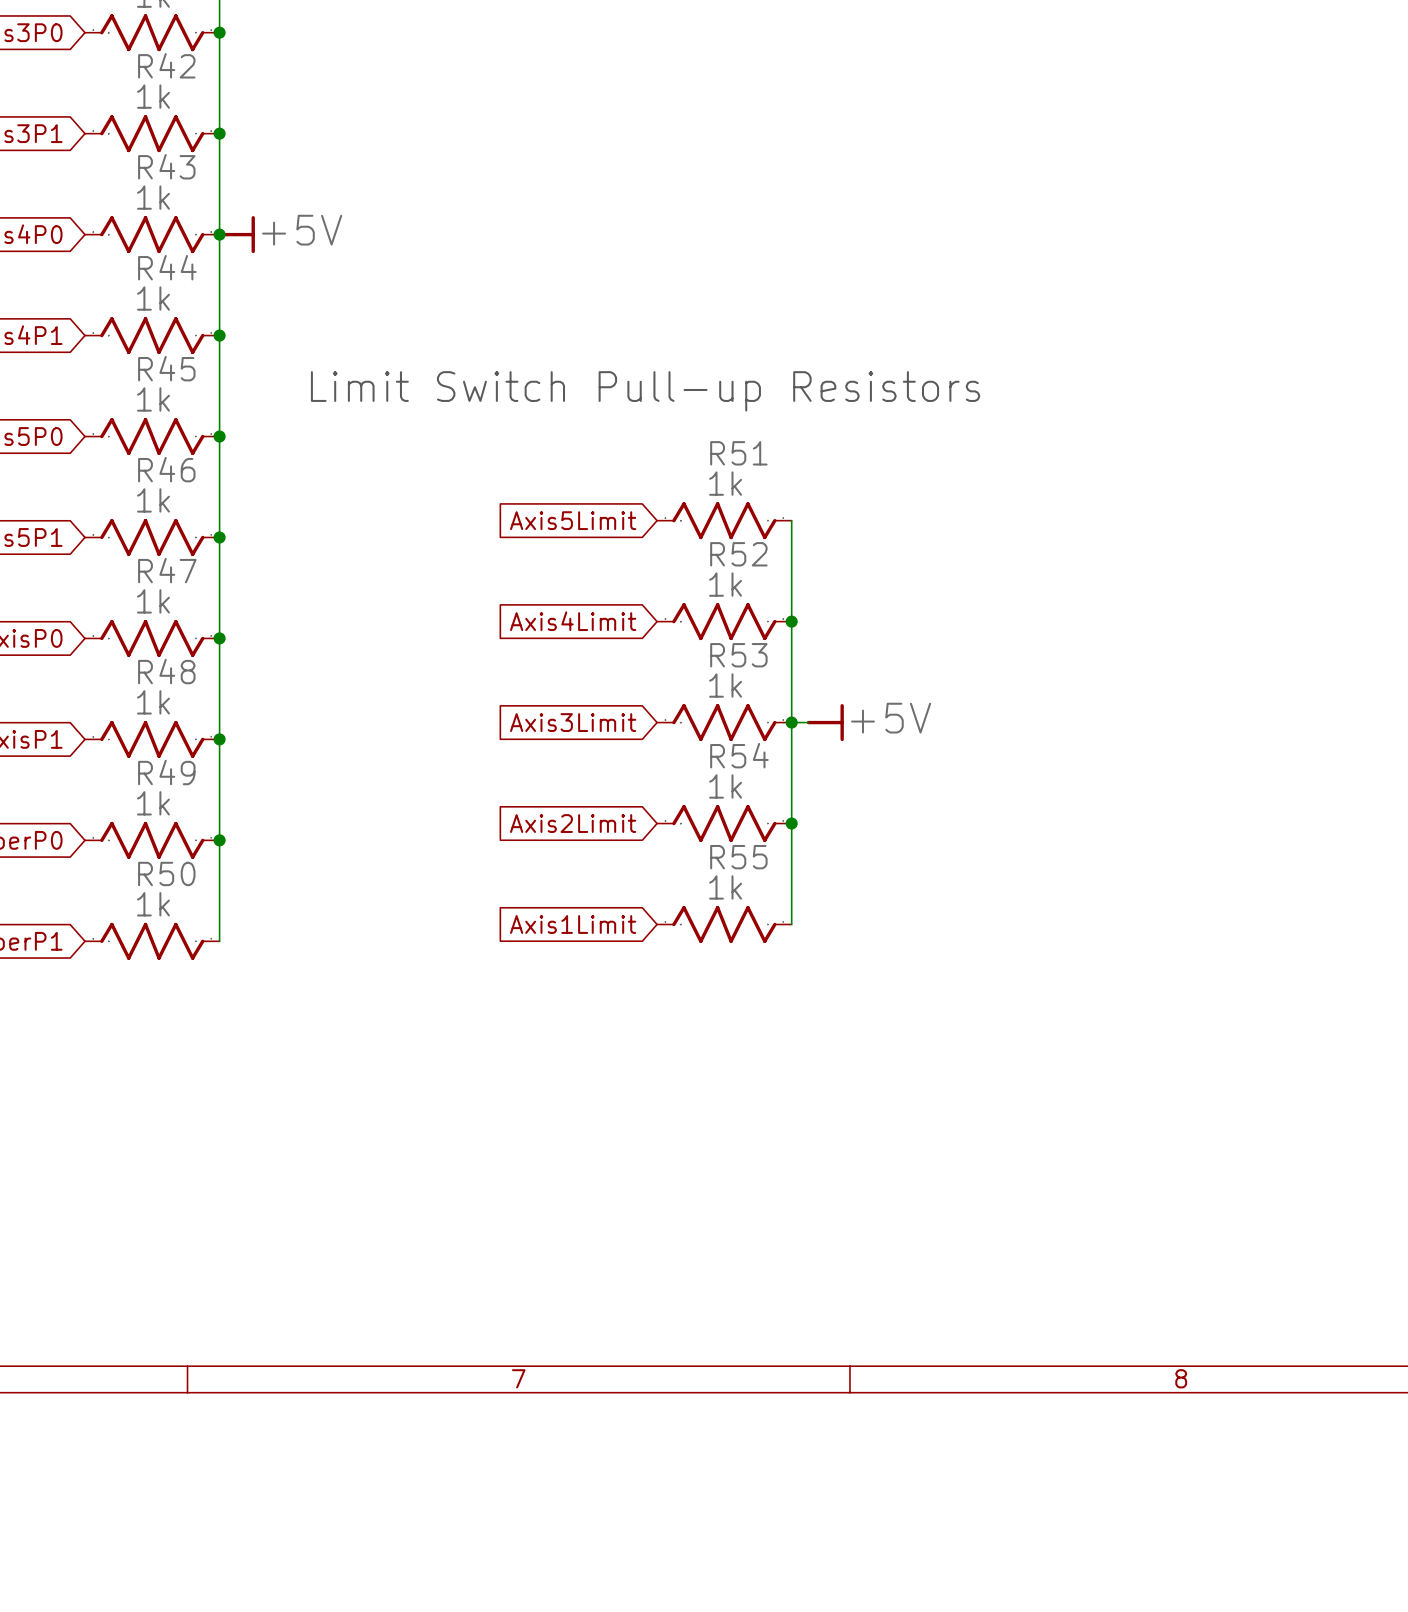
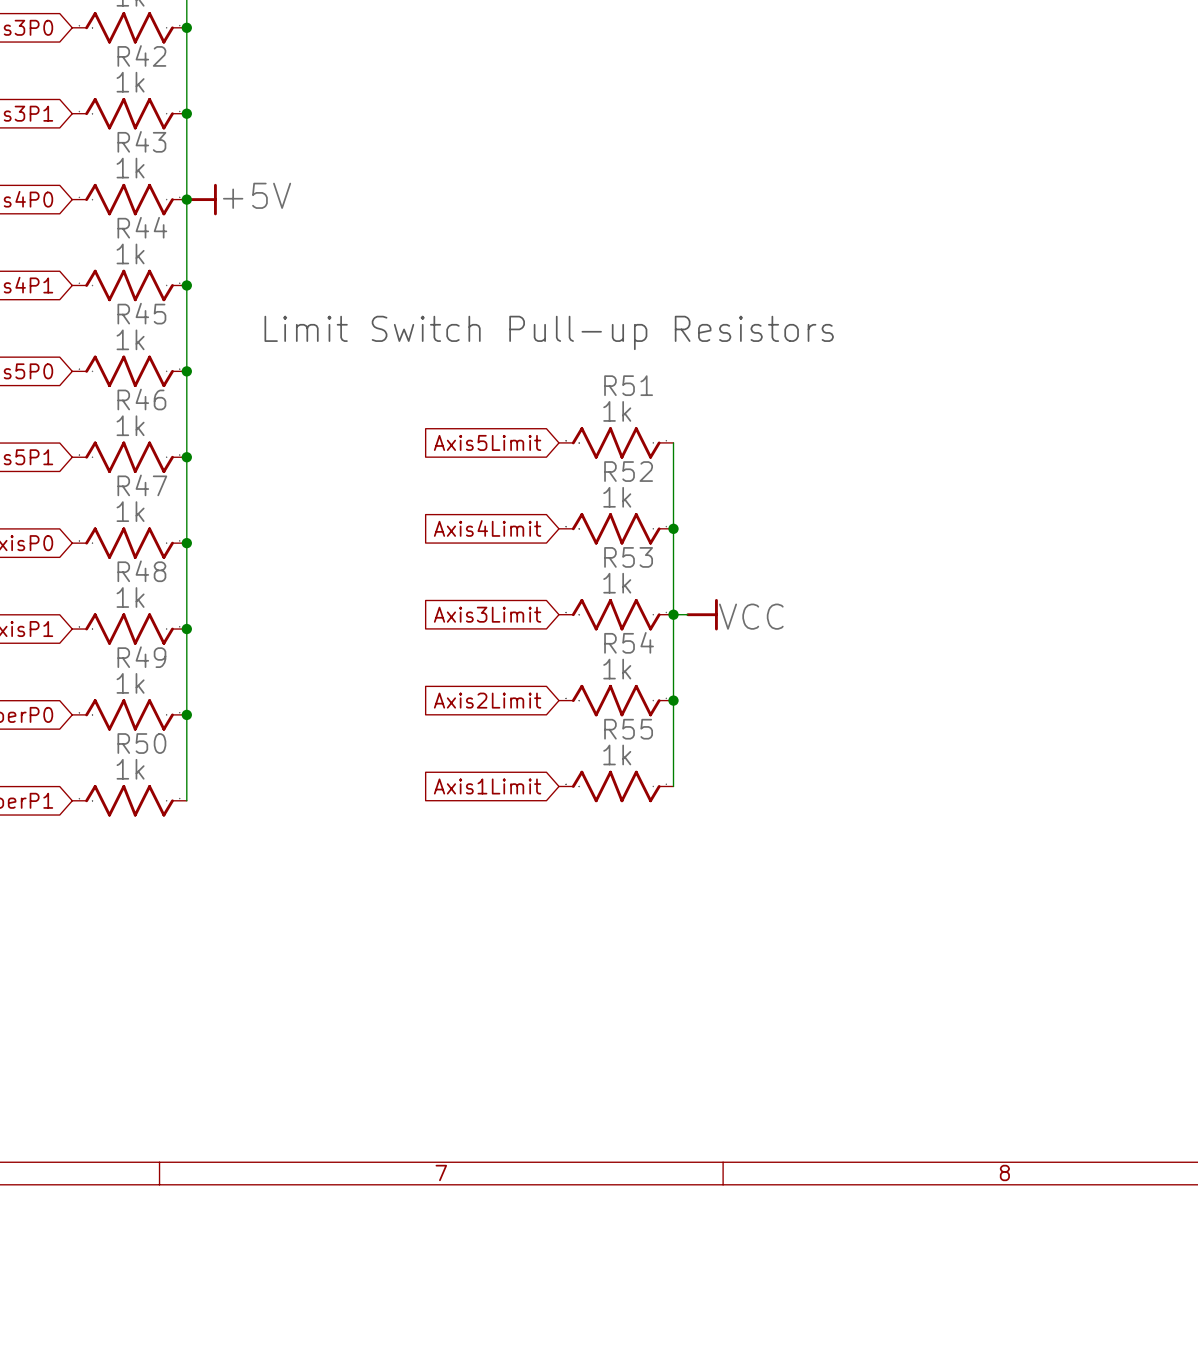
power symbol: +5V (825, 722) -> VCC (702, 614)

